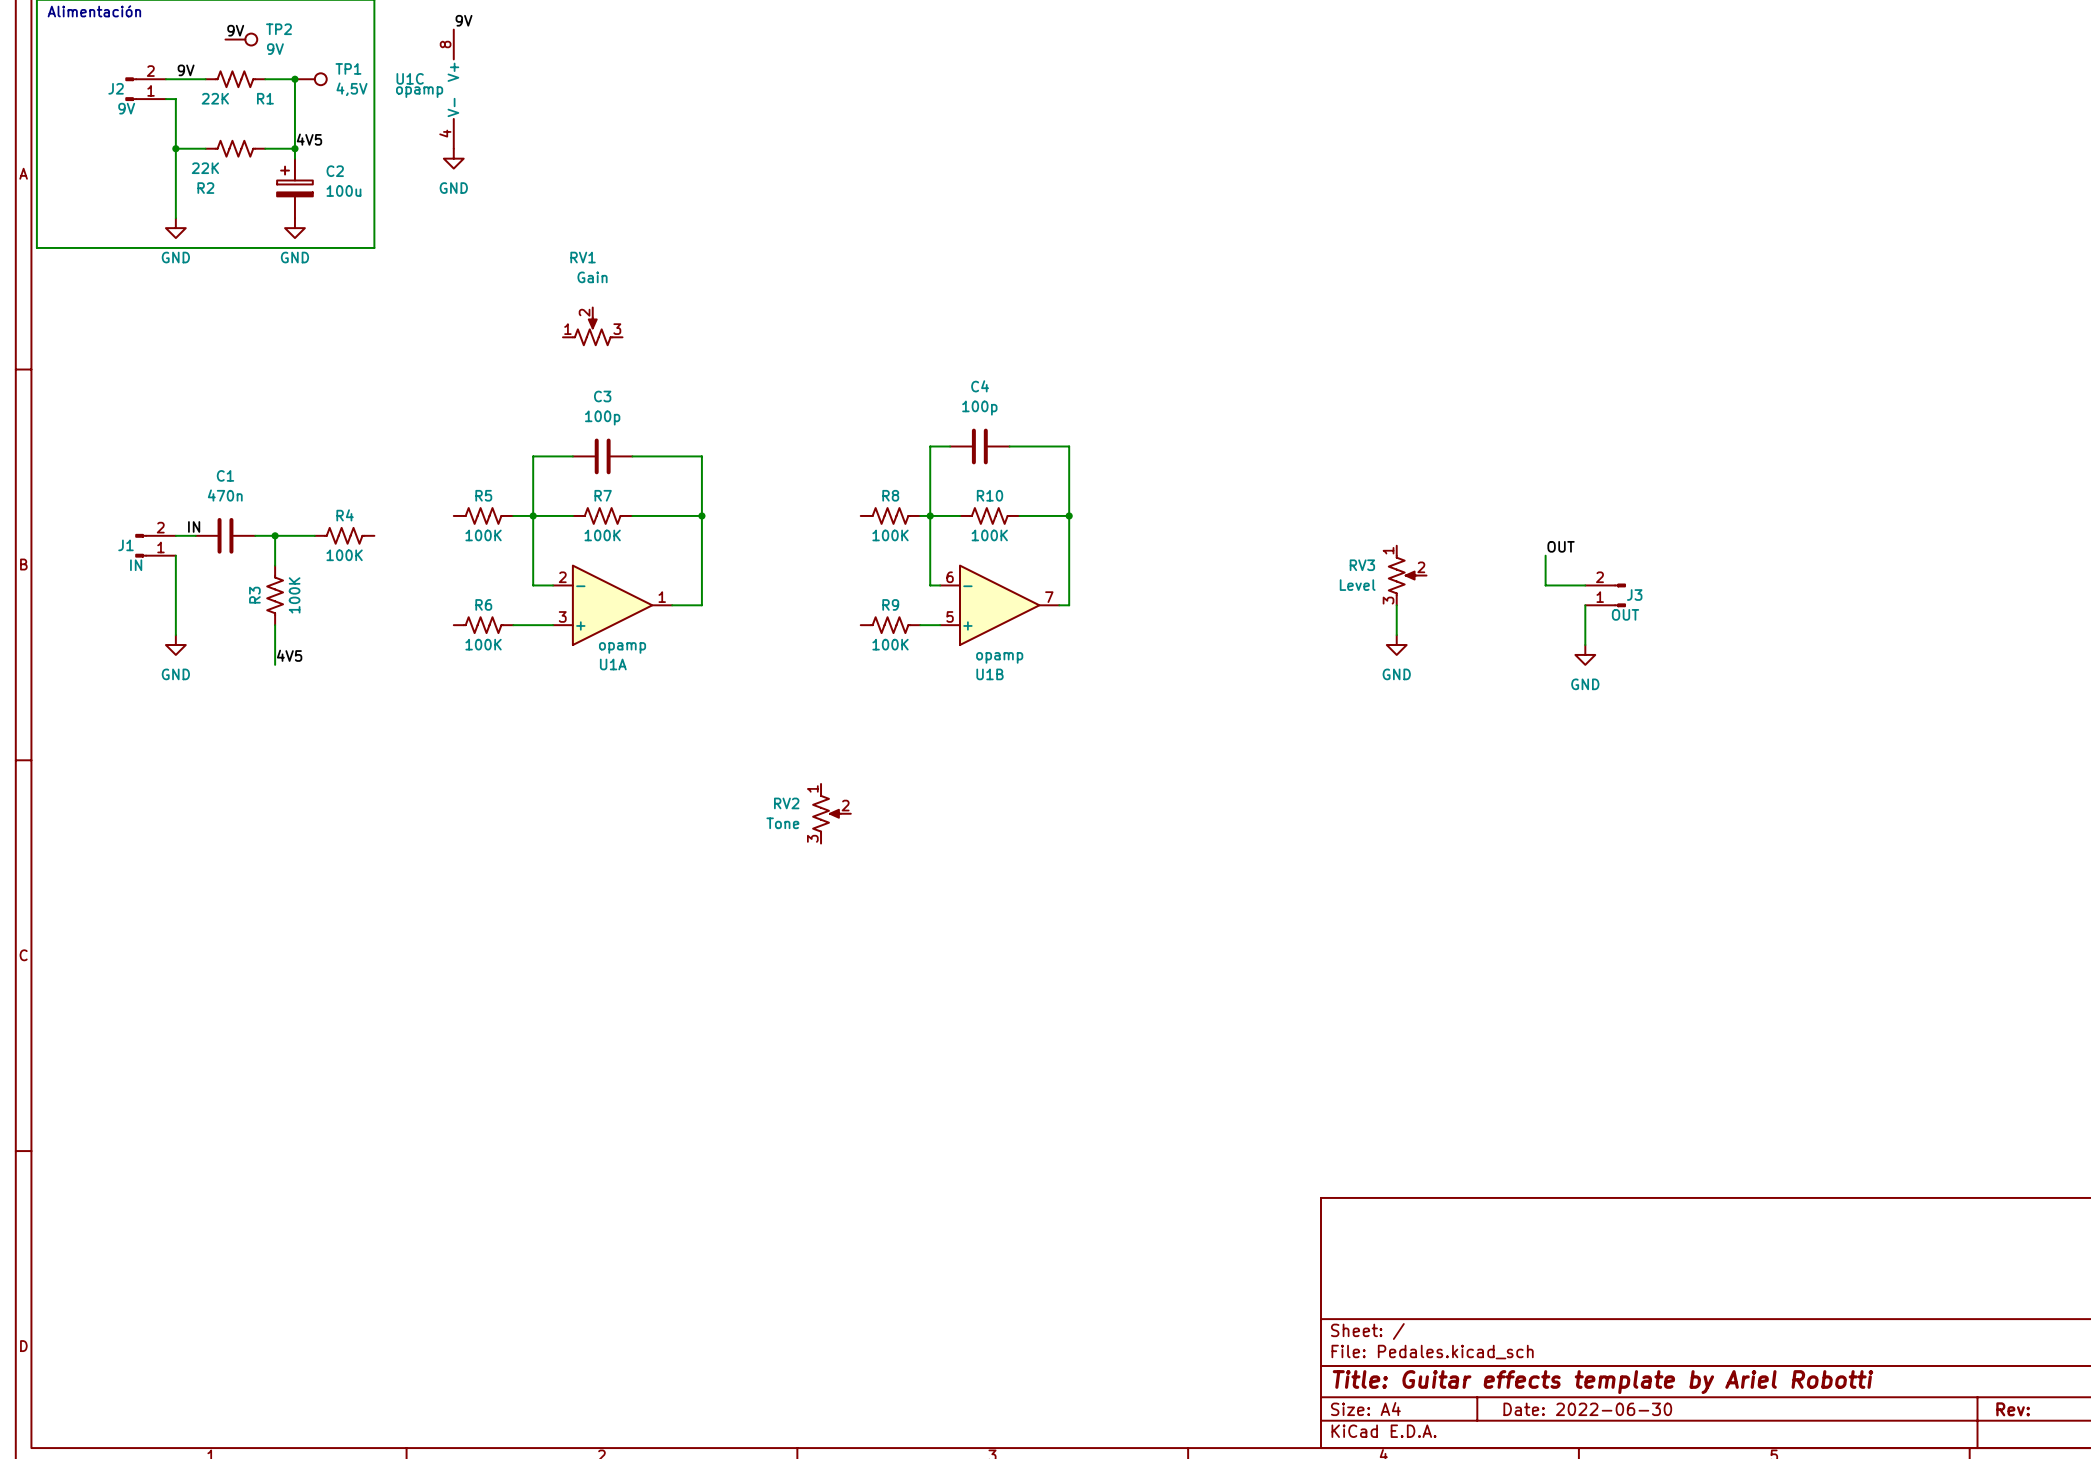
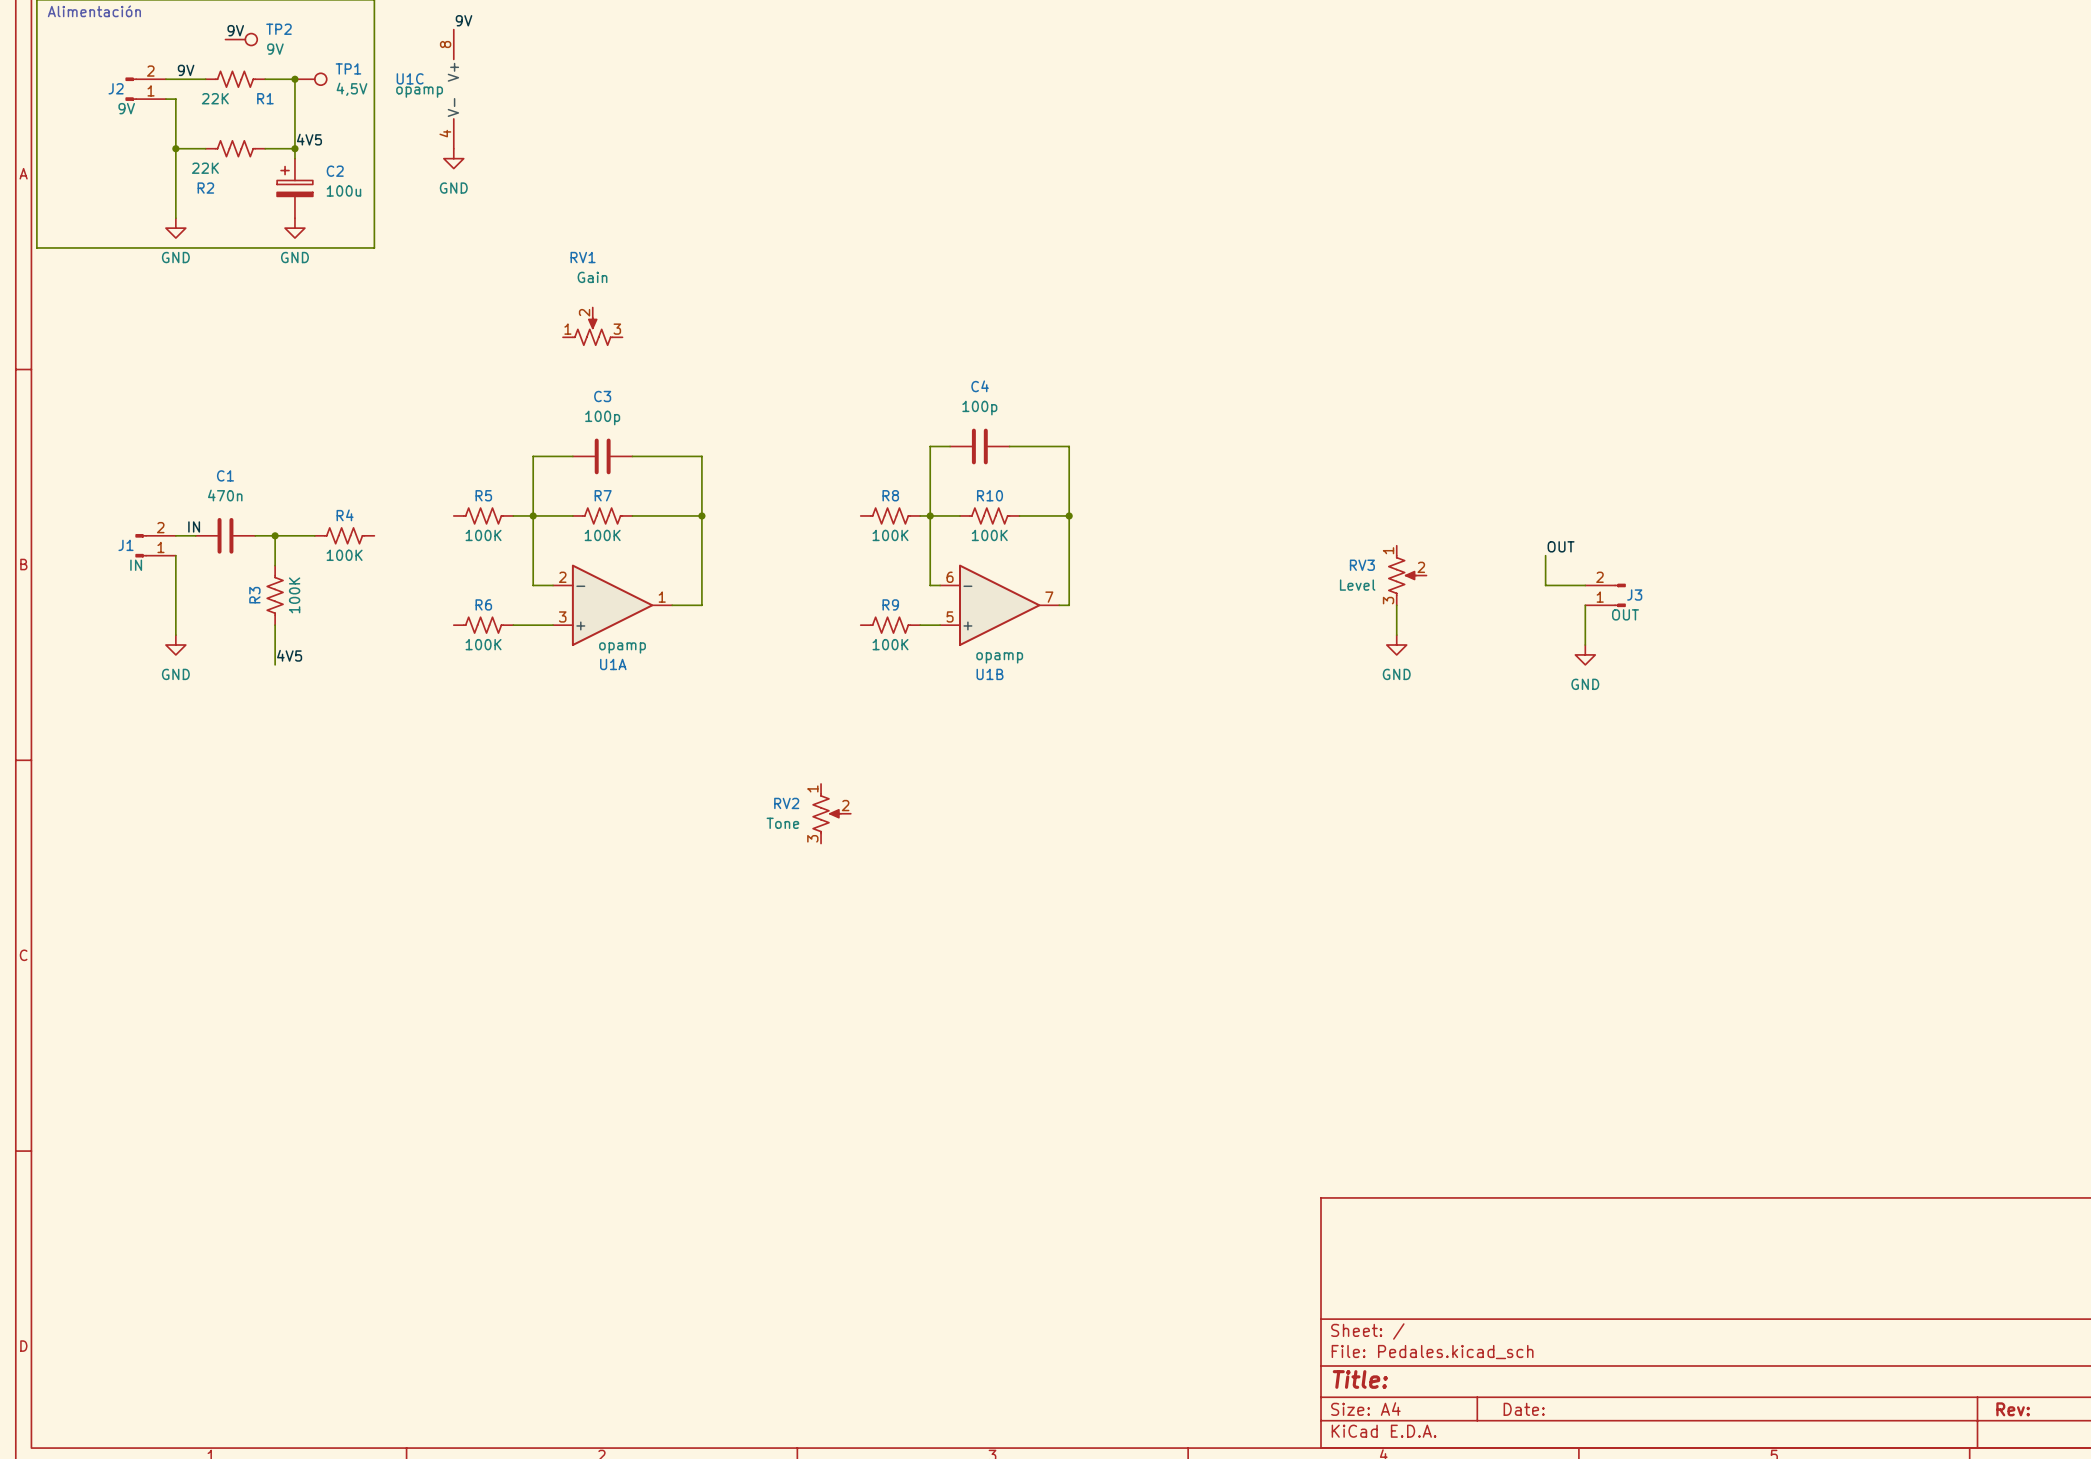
title block: Title: Guitar effects template by Ariel Robotti (1602, 1382) -> Title: (1360, 1379)
title block: Date: 2022-06-30 (1587, 1409) -> Date: (1524, 1409)

